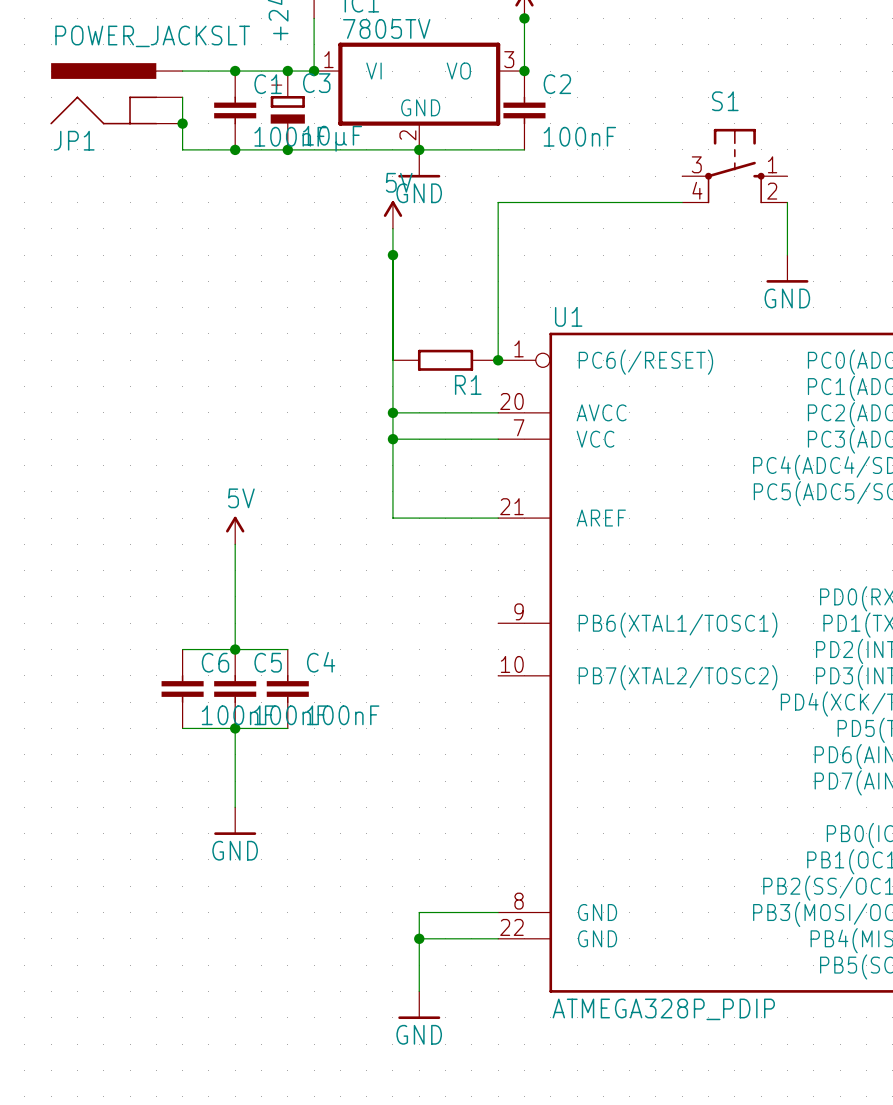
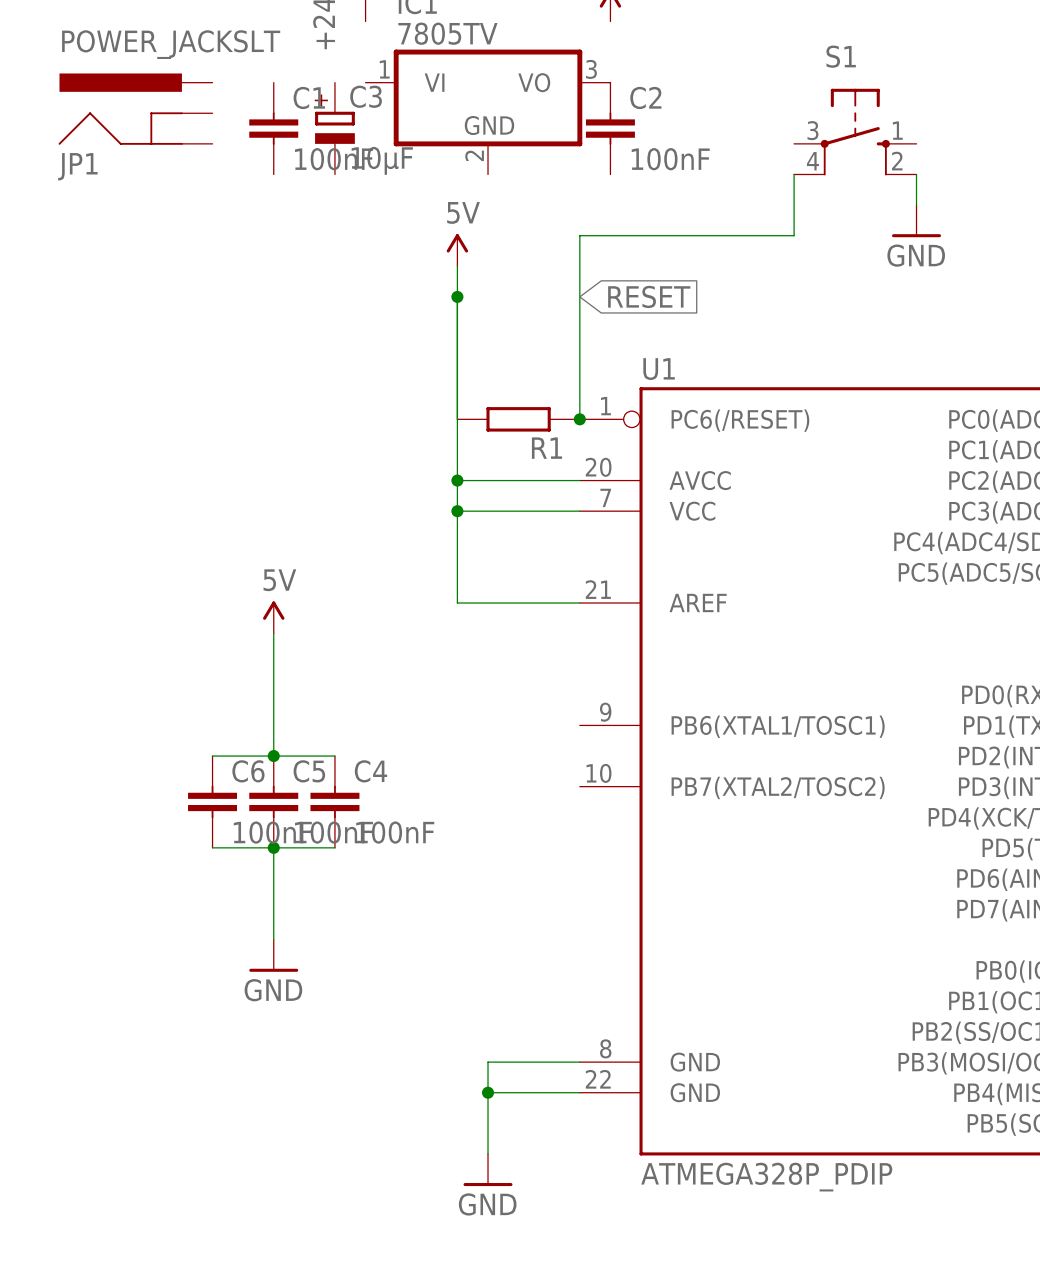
wire: (314, 18) (314, 71) (182, 71) -> none
wire: (524, 18) (524, 71) -> none
junction: (524, 18) -> none
junction: (235, 71) -> none
junction: (287, 71) -> none
junction: (314, 71) -> none
junction: (524, 71) -> none
wire: (182, 97) (182, 149) (524, 149) -> none
junction: (182, 123) -> none
junction: (235, 149) -> none
junction: (287, 149) -> none
junction: (419, 149) -> none
wire: none -> (916, 174) (916, 205)
power symbol: GND (419, 163) -> none
S1 position: (734, 166) -> (855, 132)
wire: (787, 202) (787, 255) -> (794, 174) (794, 235)
global label: none -> RESET (649, 296)
power symbol position: GND (787, 268) -> GND (916, 221)

